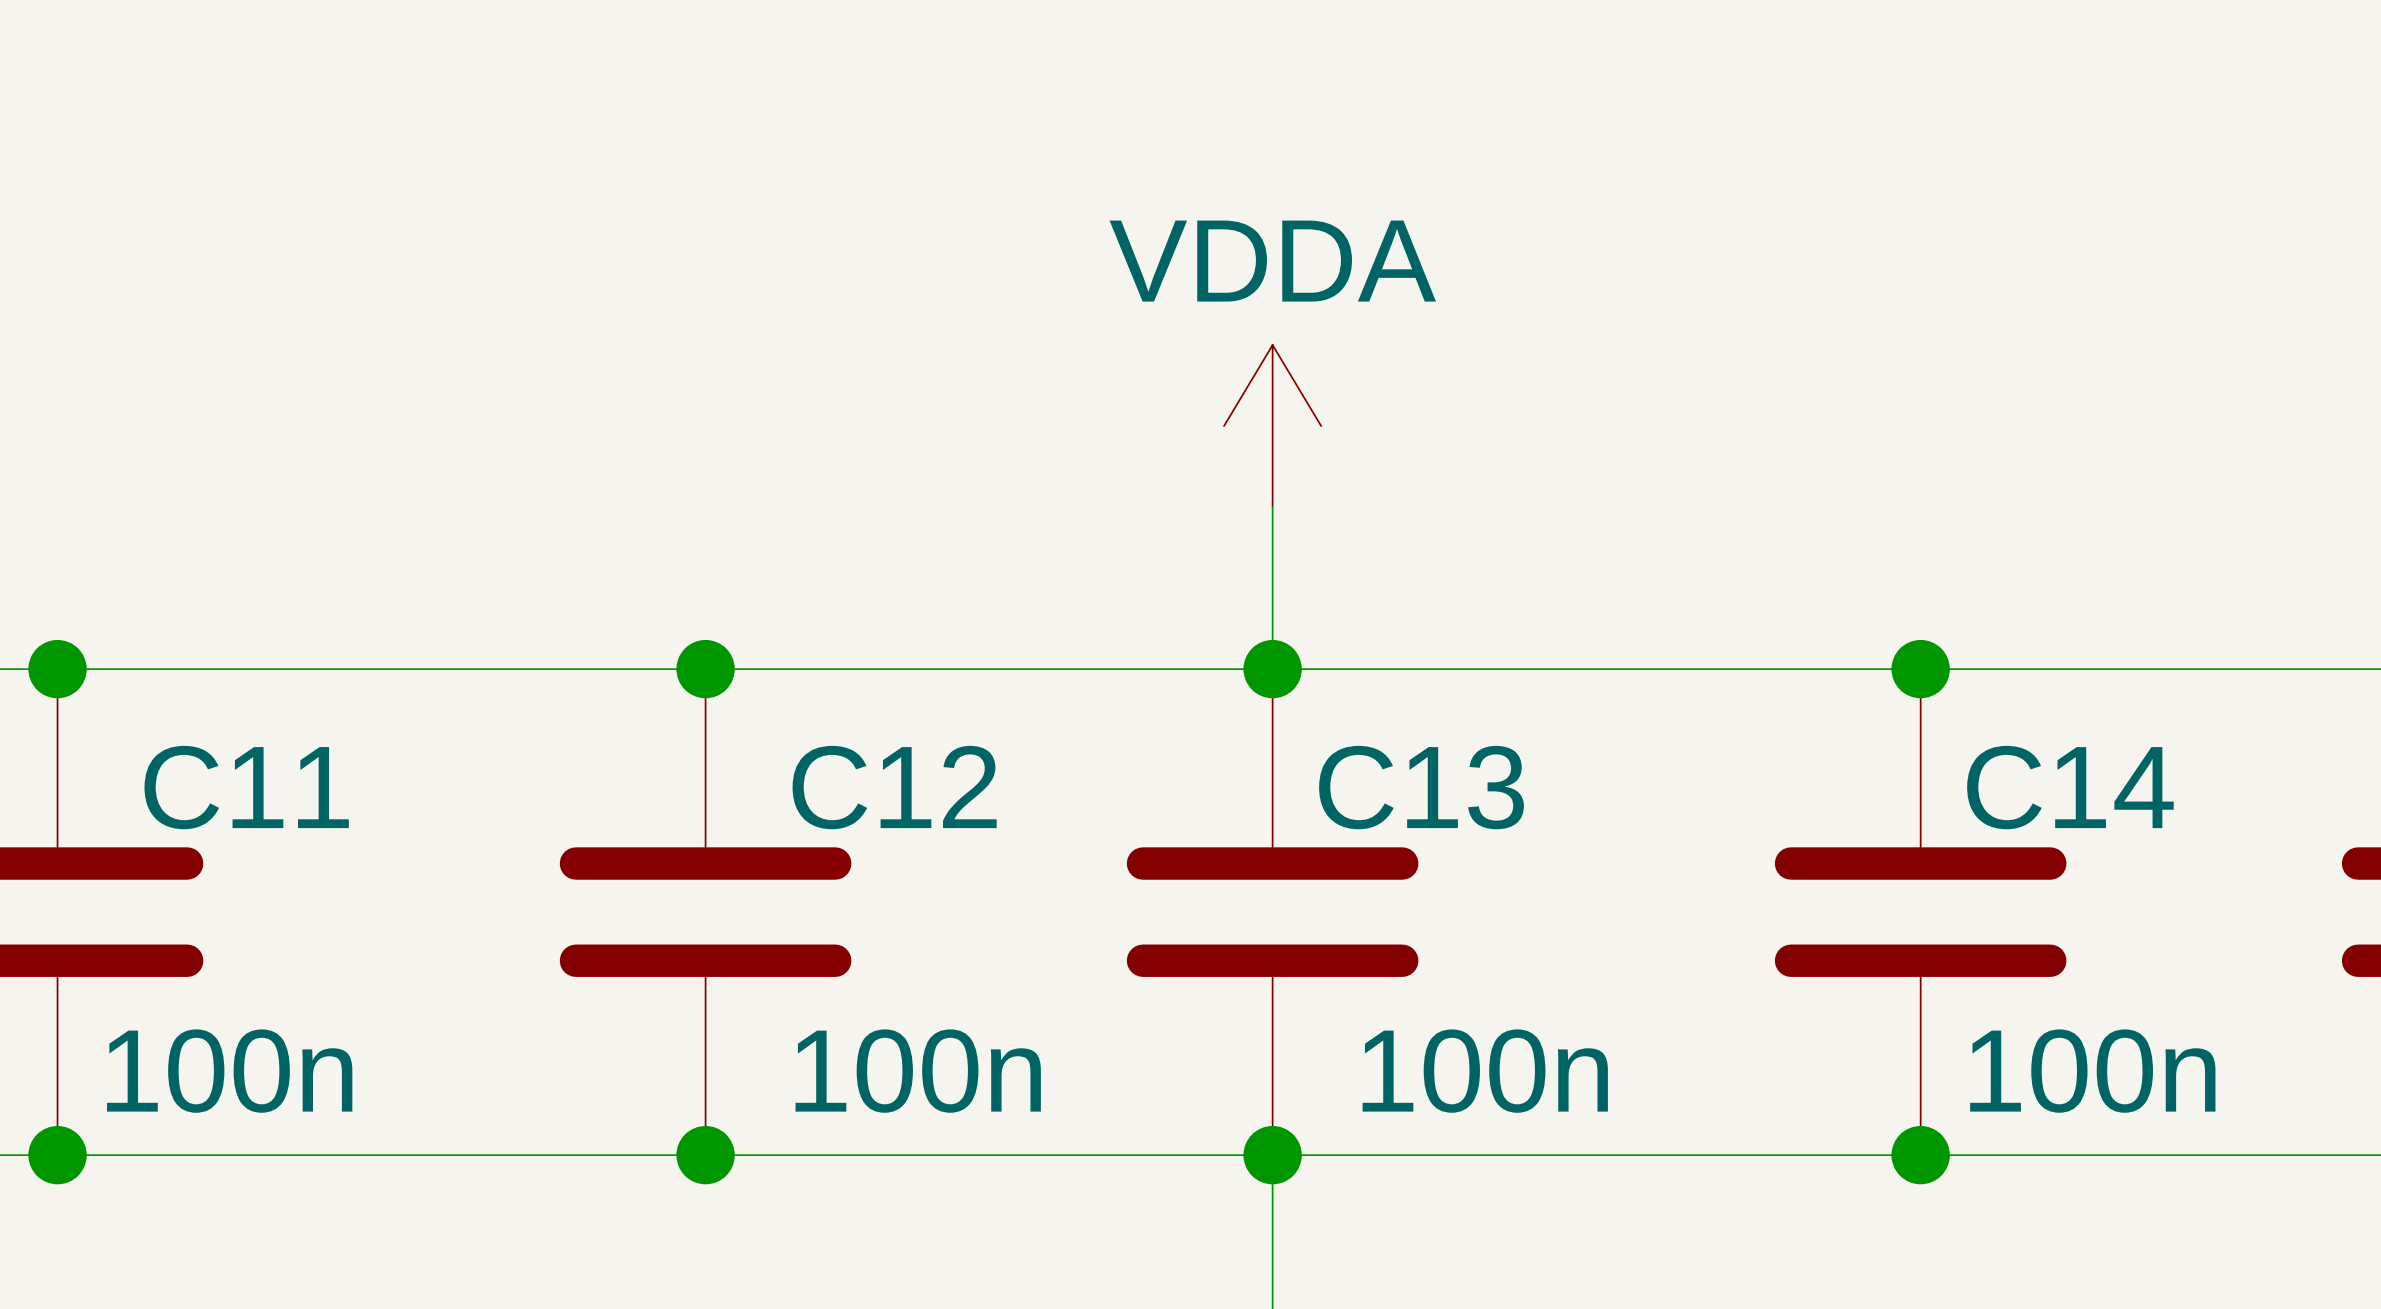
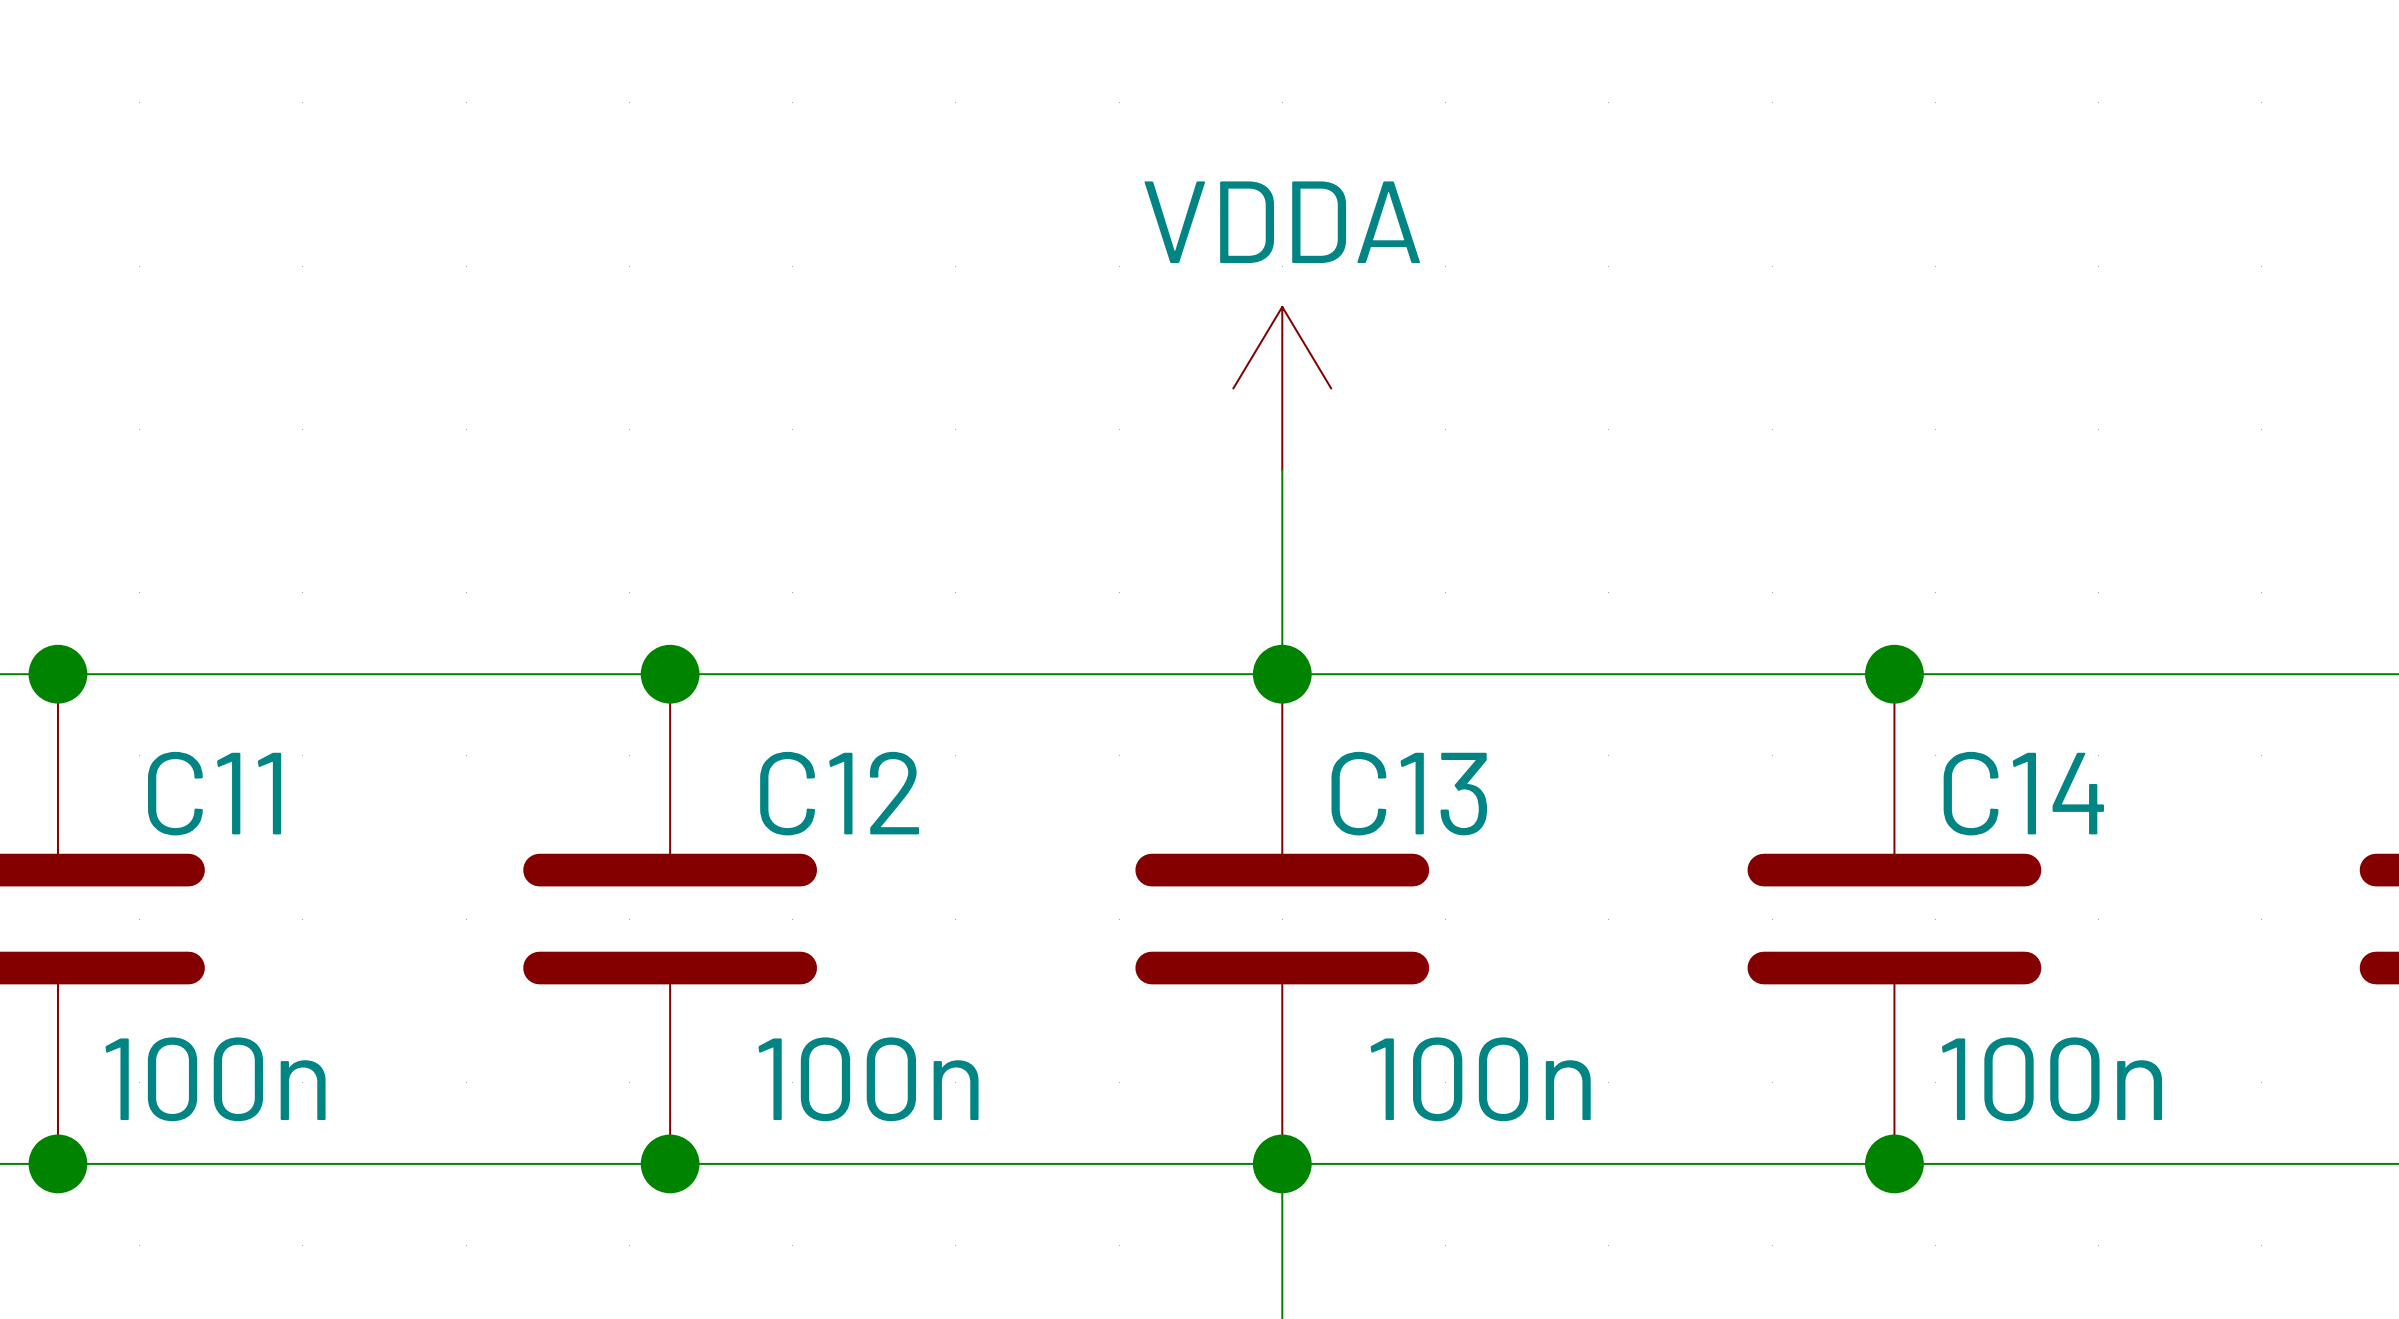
power symbol position: VDDA (1272, 426) -> VDDA (1282, 388)
junction position: (705, 669) -> (670, 674)
junction position: (1920, 669) -> (1894, 674)
C12 position: (705, 912) -> (670, 919)
C14 position: (1920, 912) -> (1894, 919)
junction position: (705, 1155) -> (670, 1163)
junction position: (1920, 1155) -> (1894, 1163)

